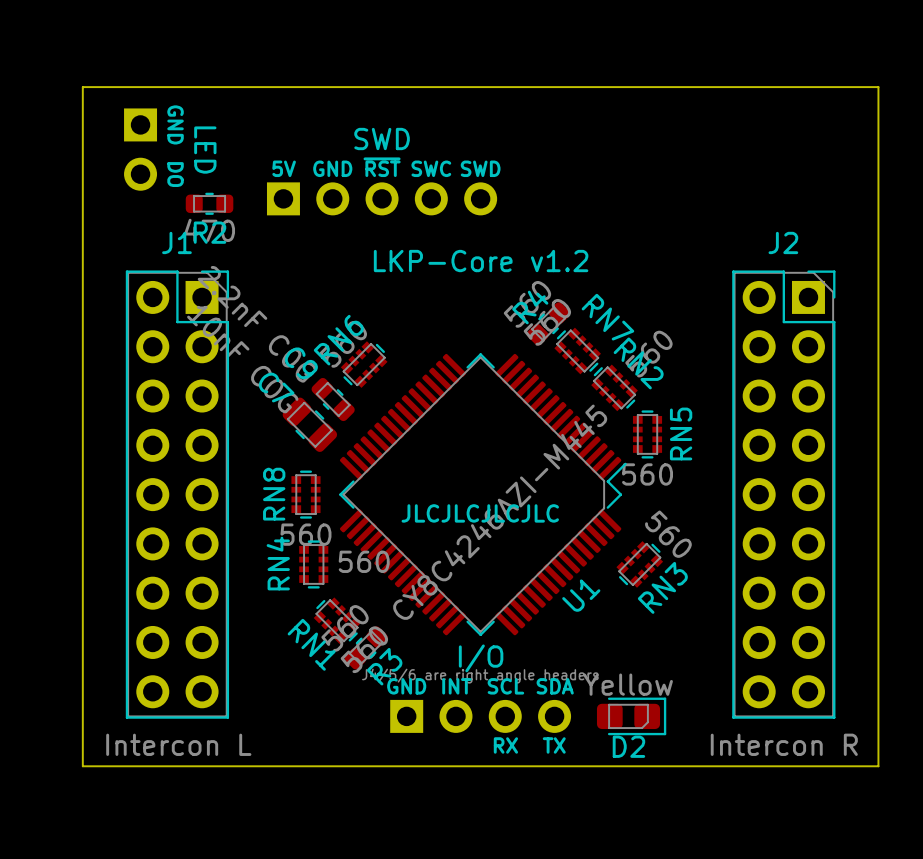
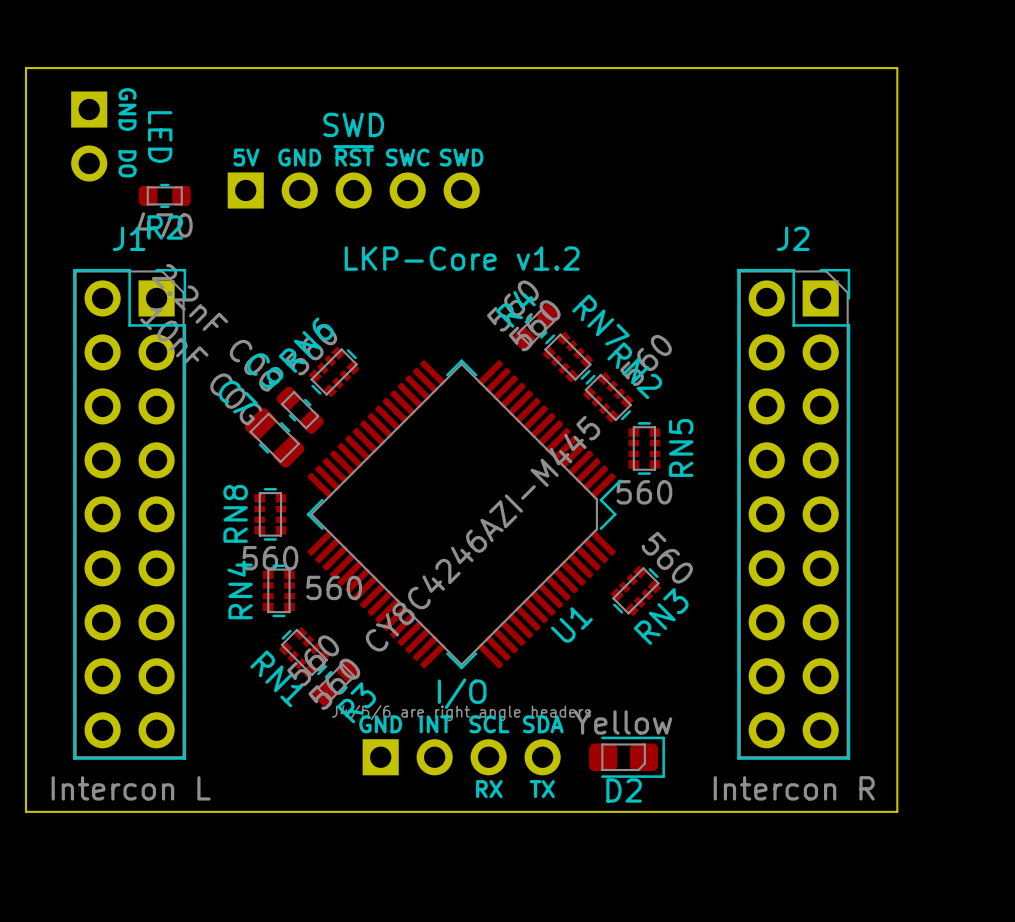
text: JLCJLCJLCJLC (480, 513) -> none

